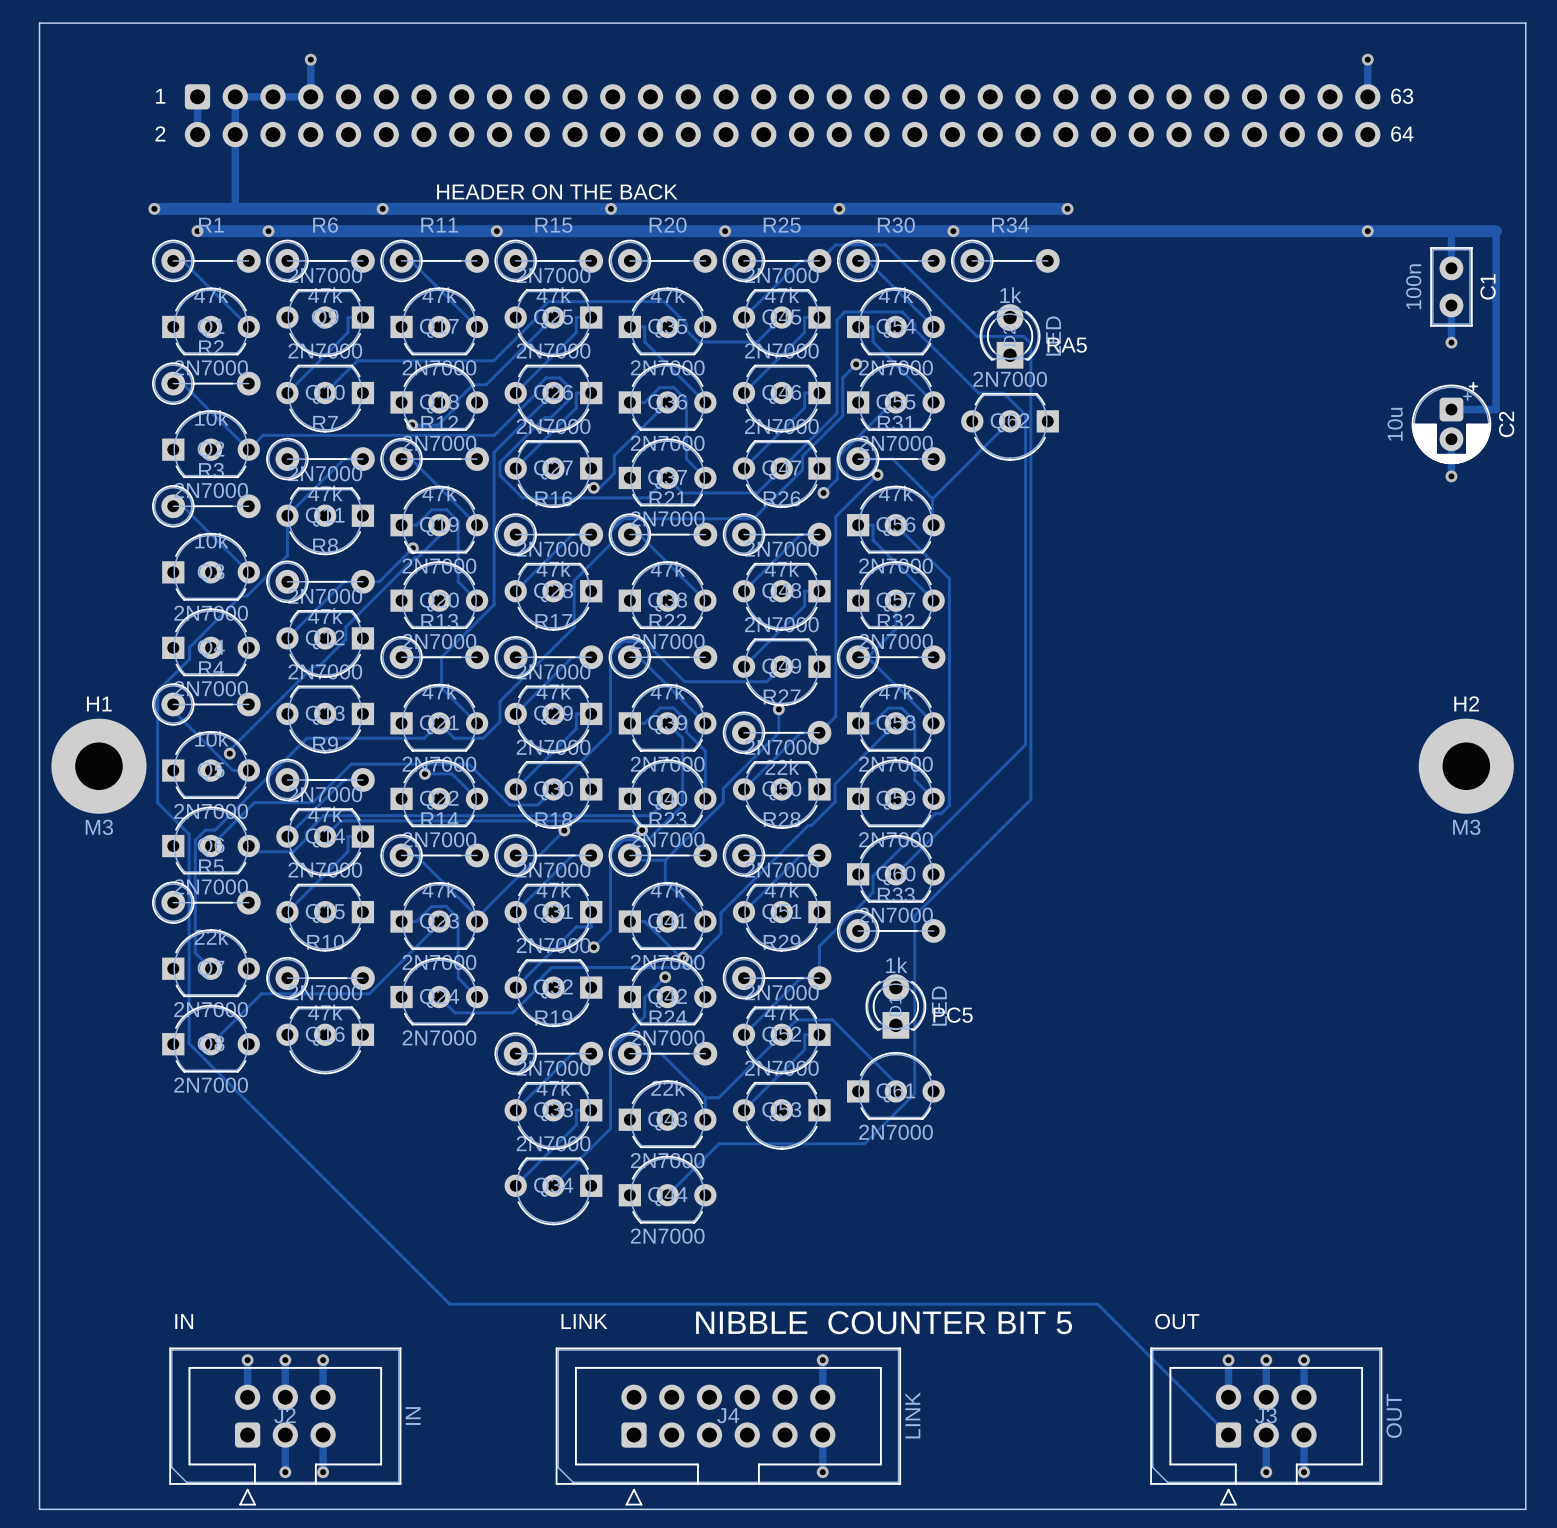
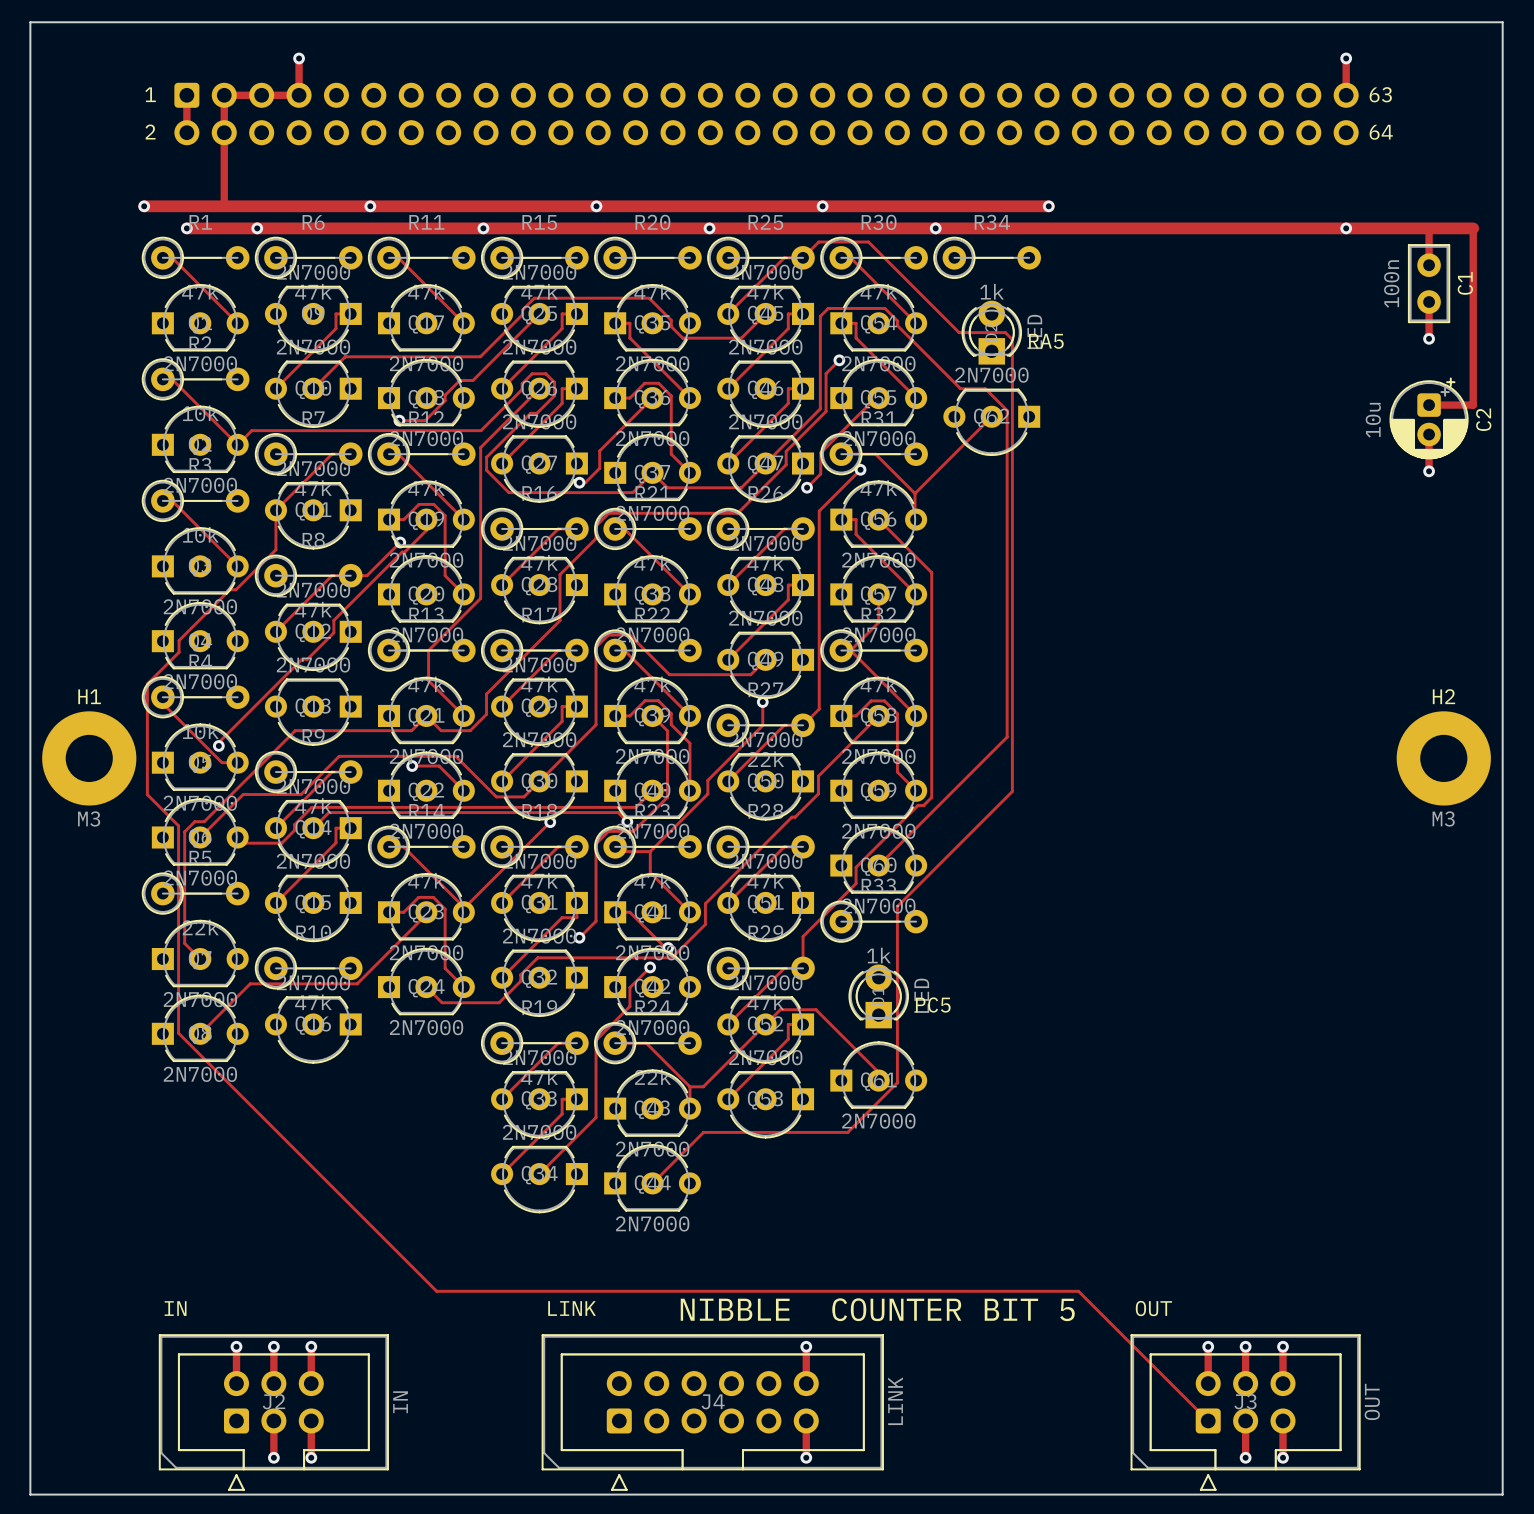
text: HEADER ON THE BACK (557, 191) -> none

